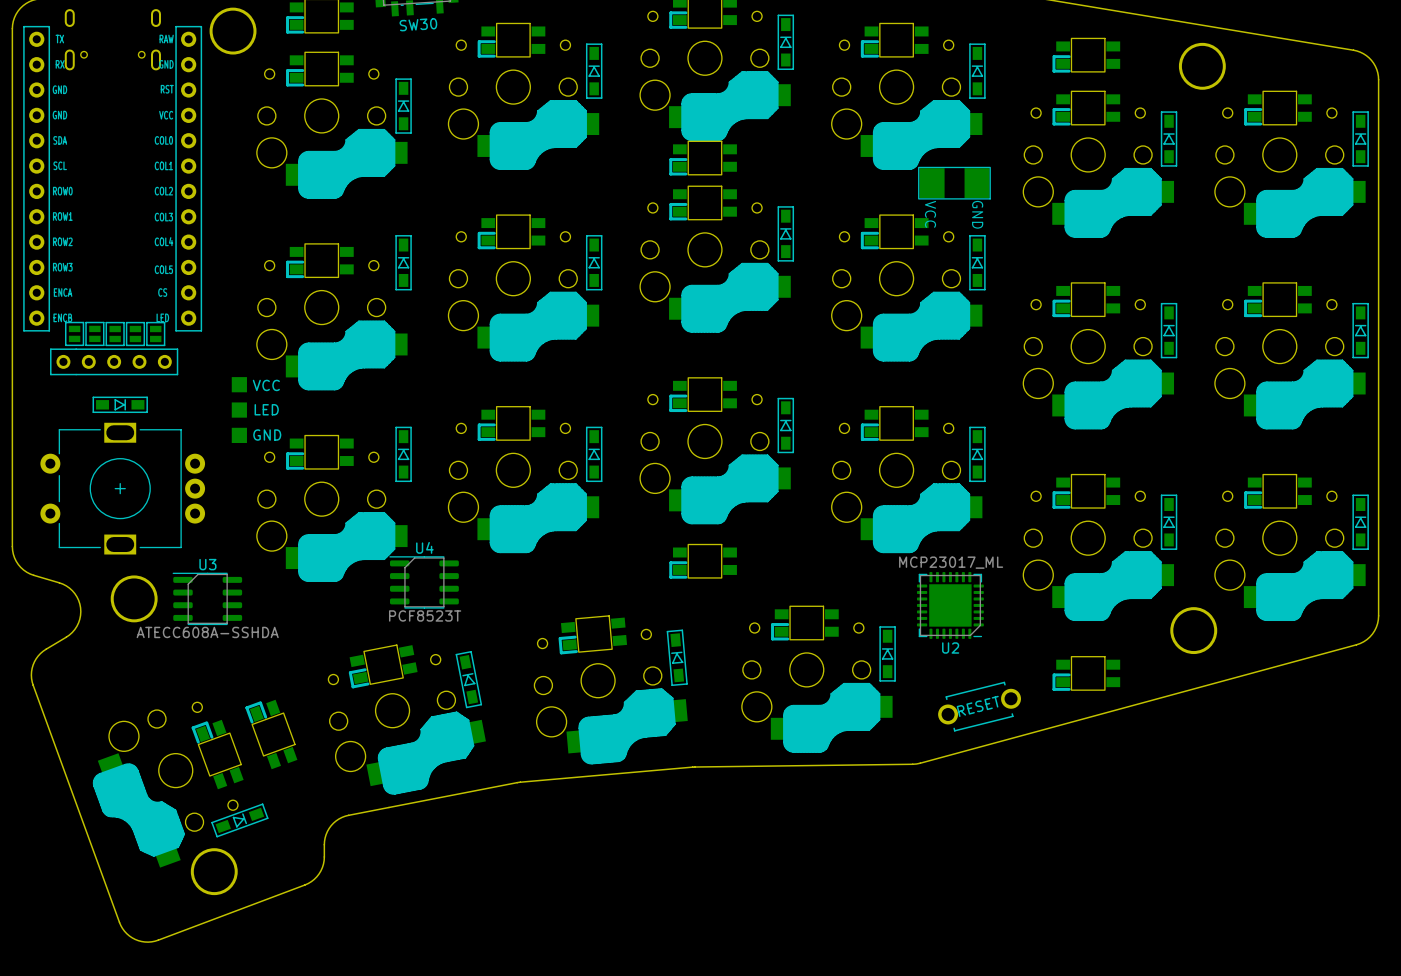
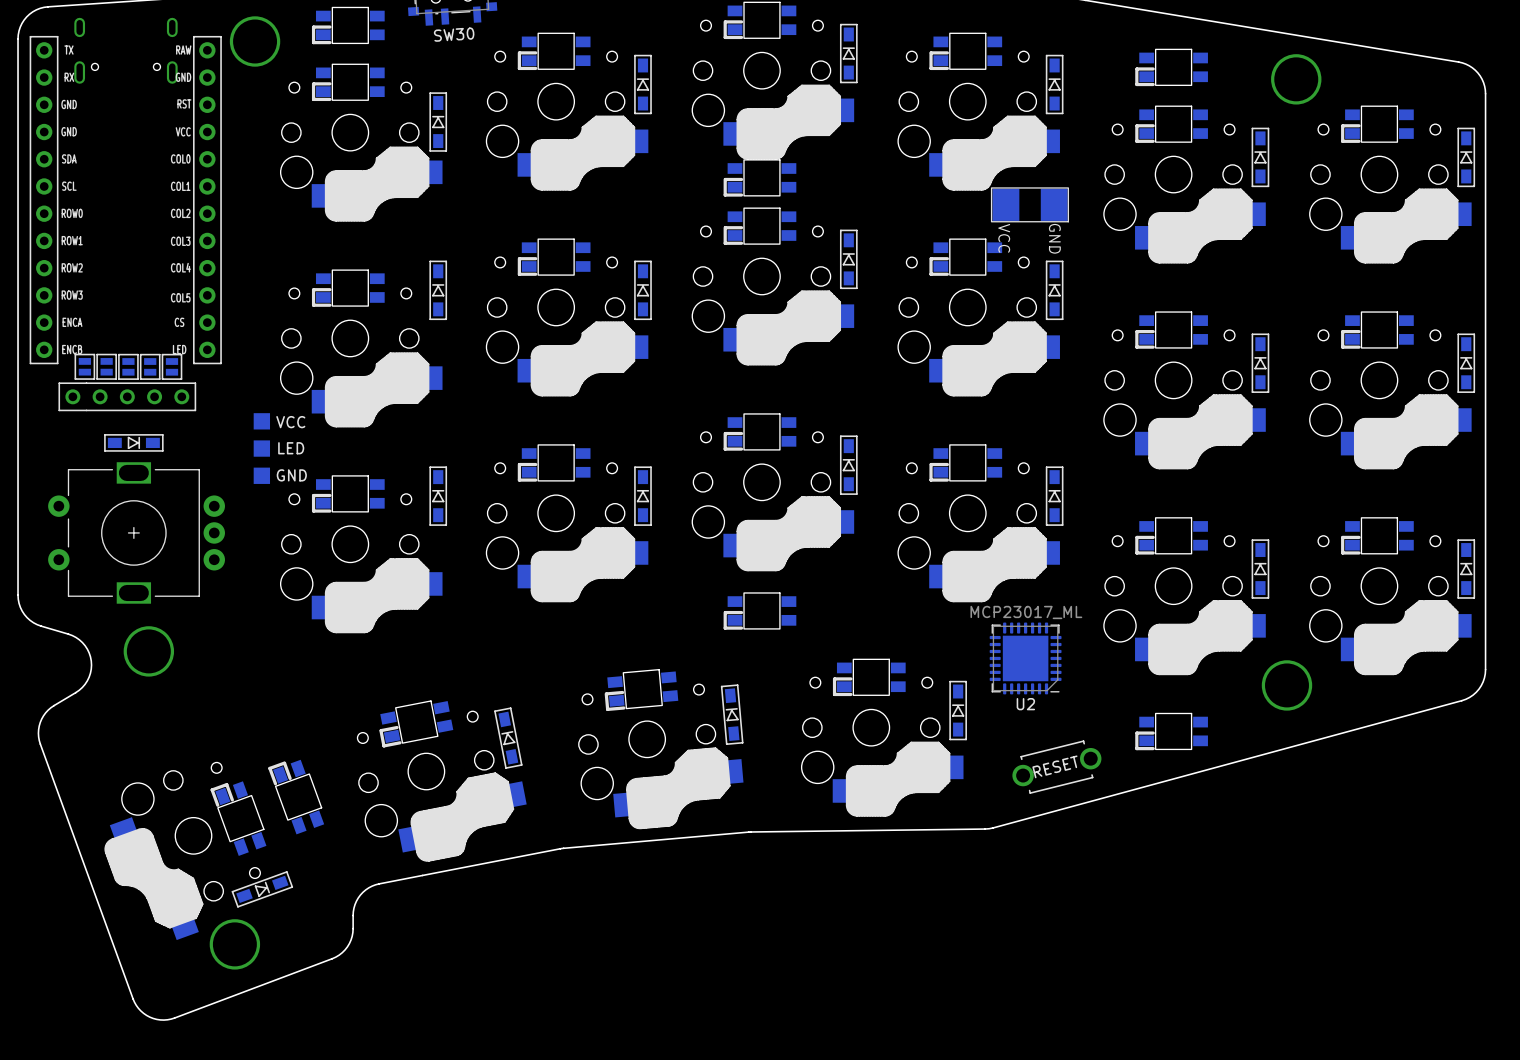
U4: PCF8523T (424, 582) -> none
U3: ATECC608A-SSHDA (207, 598) -> none

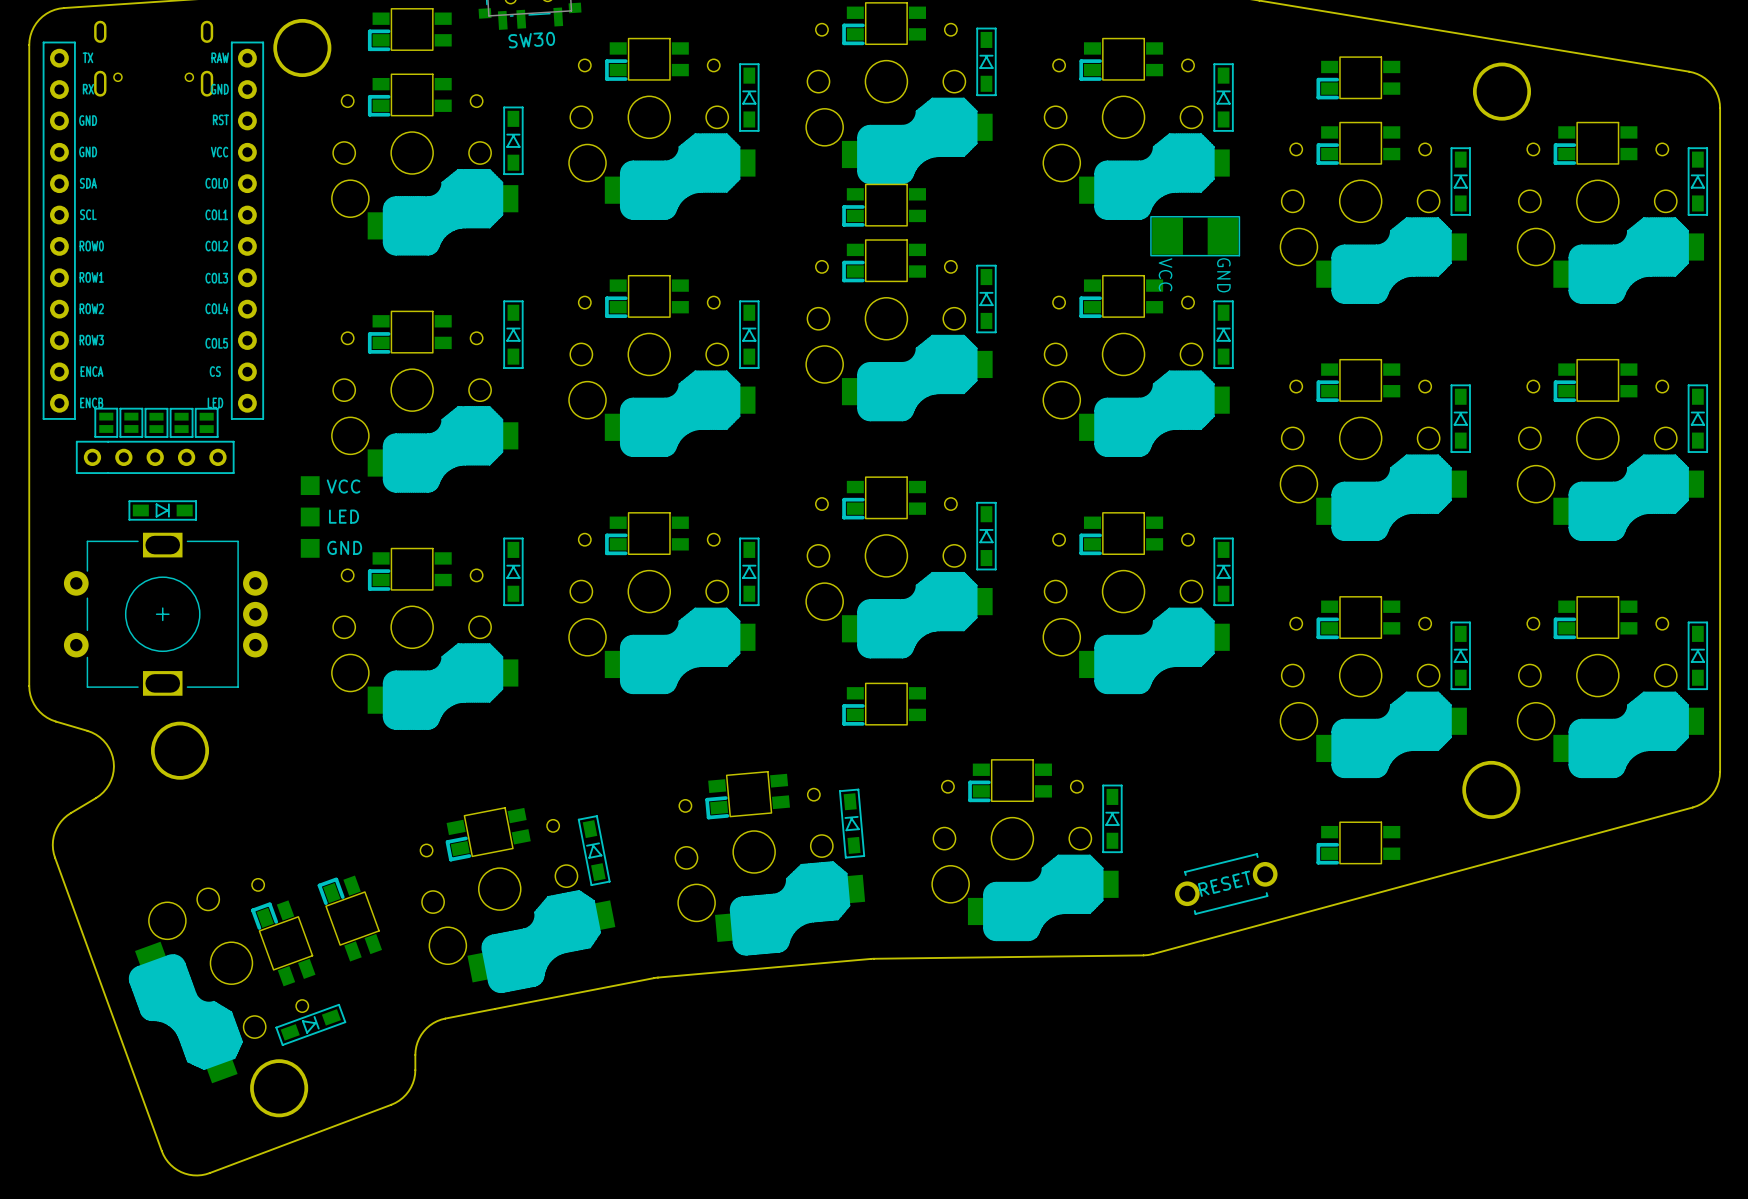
U2: MCP23017_ML (1025, 658) -> none

